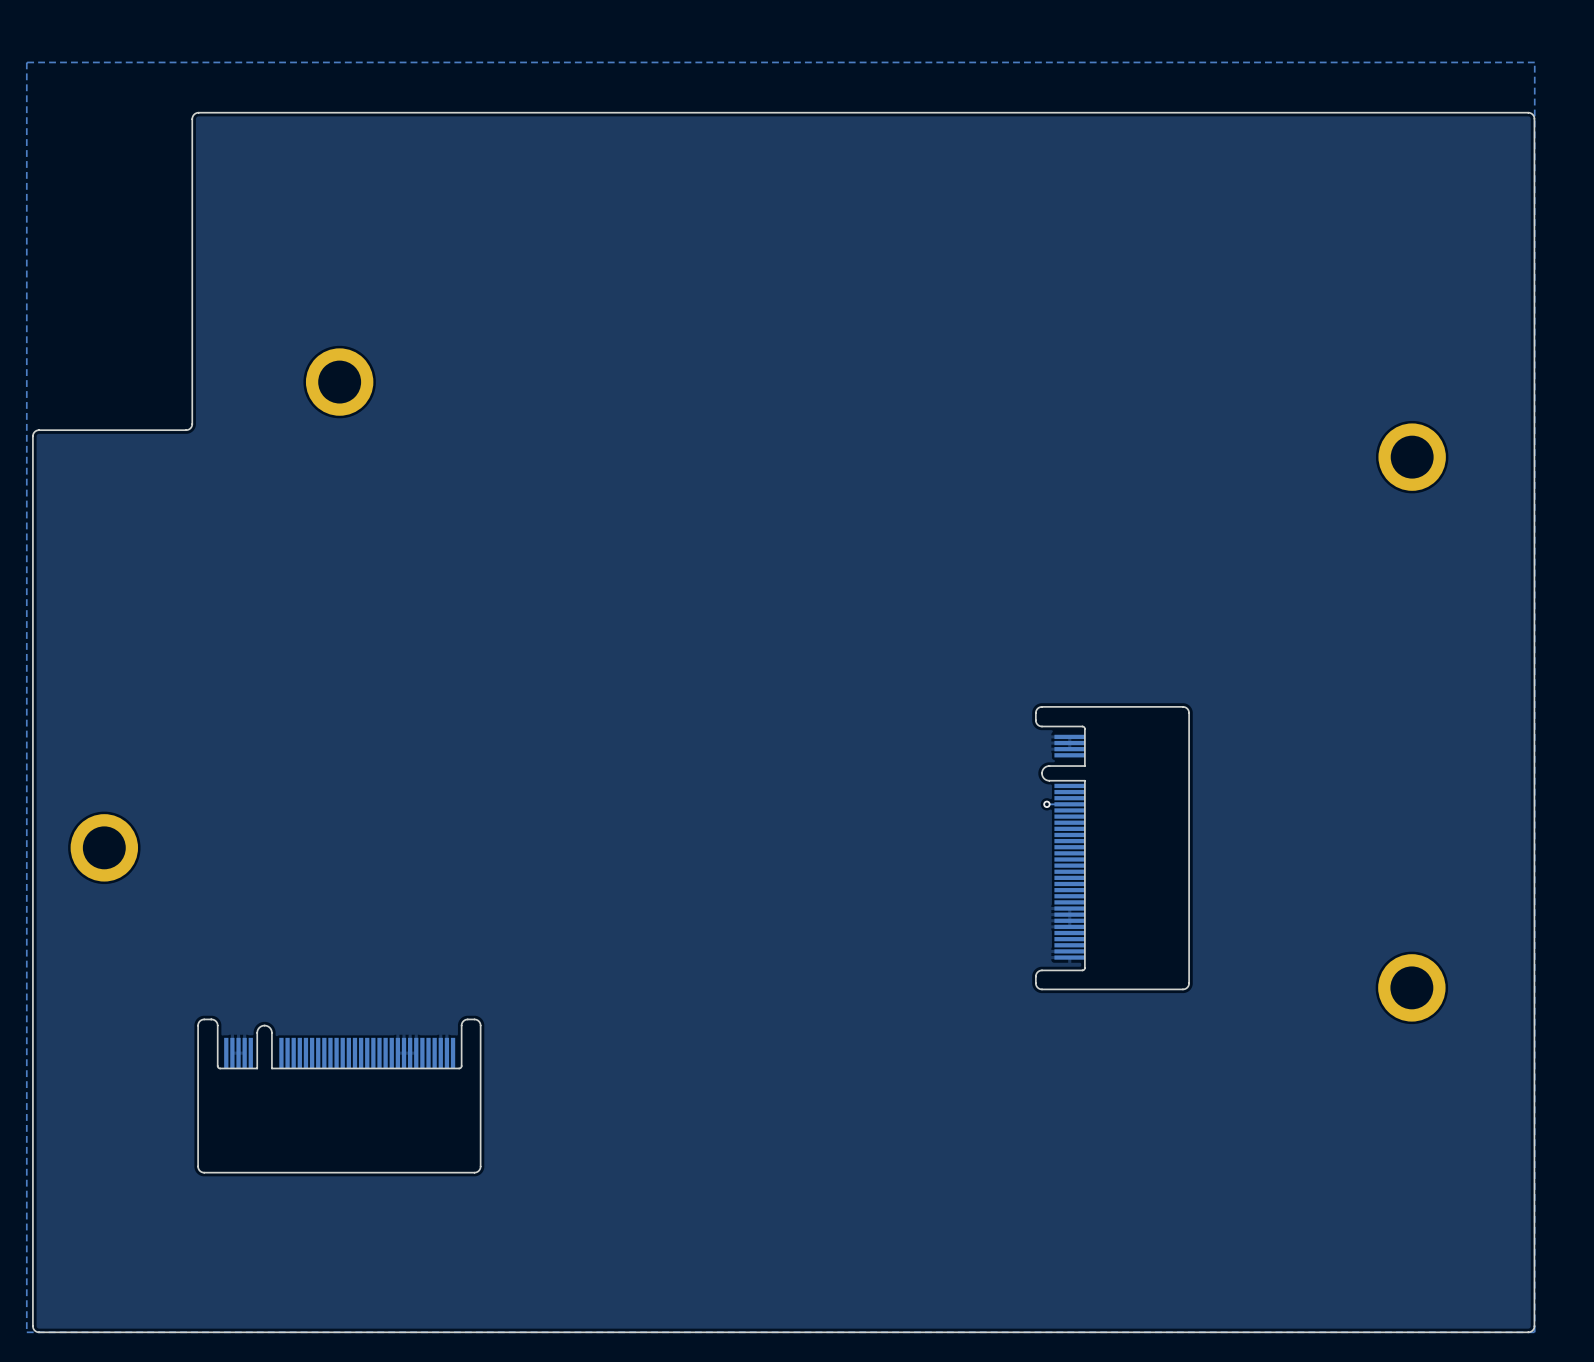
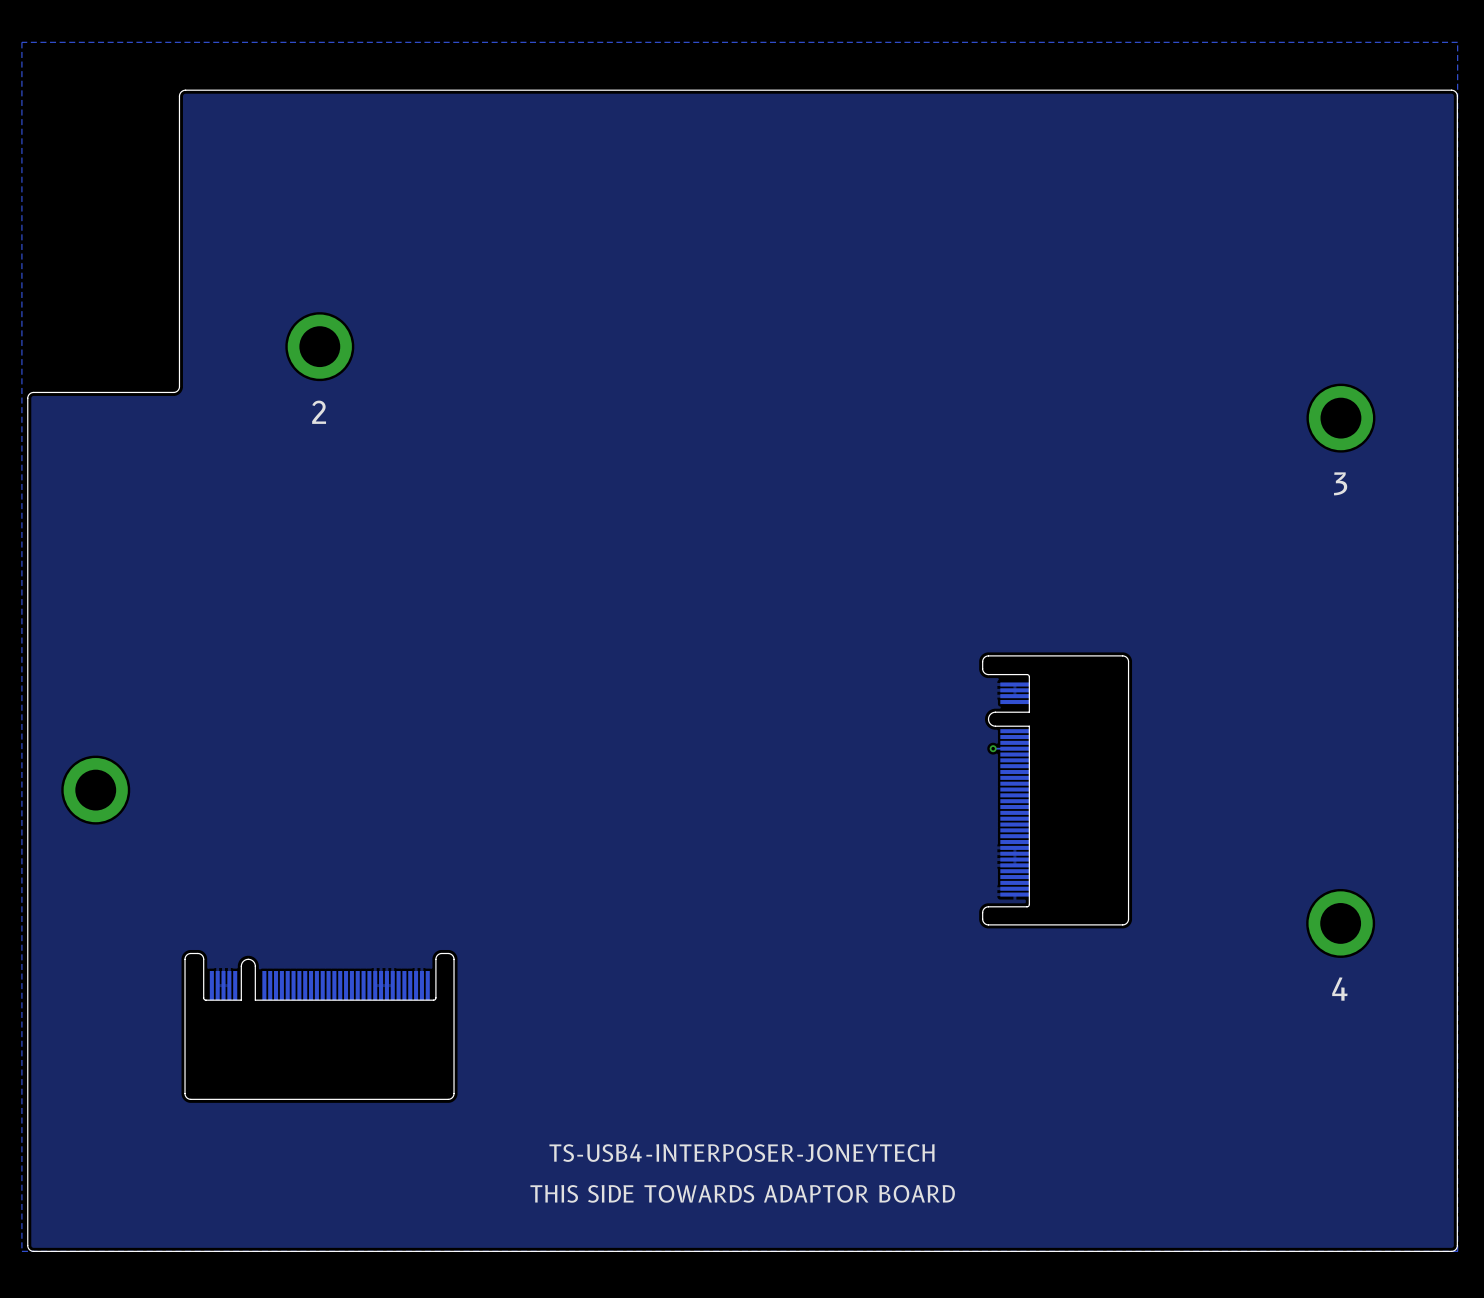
text: none -> 2 (319, 412)
text: none -> 3 (1340, 483)
text: none -> 4 (1339, 989)
text: none -> TS-USB4-INTERPOSER-JONEYTECH (741, 1153)
text: none -> THIS SIDE TOWARDS ADAPTOR BOARD (742, 1193)

